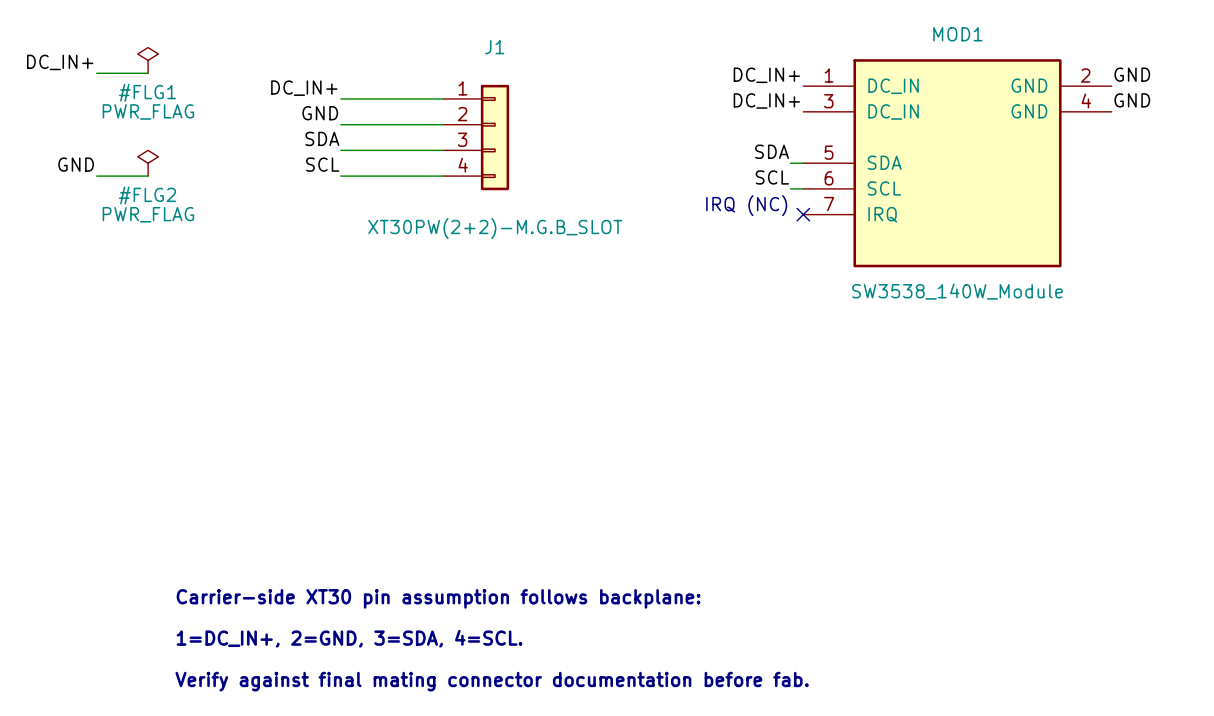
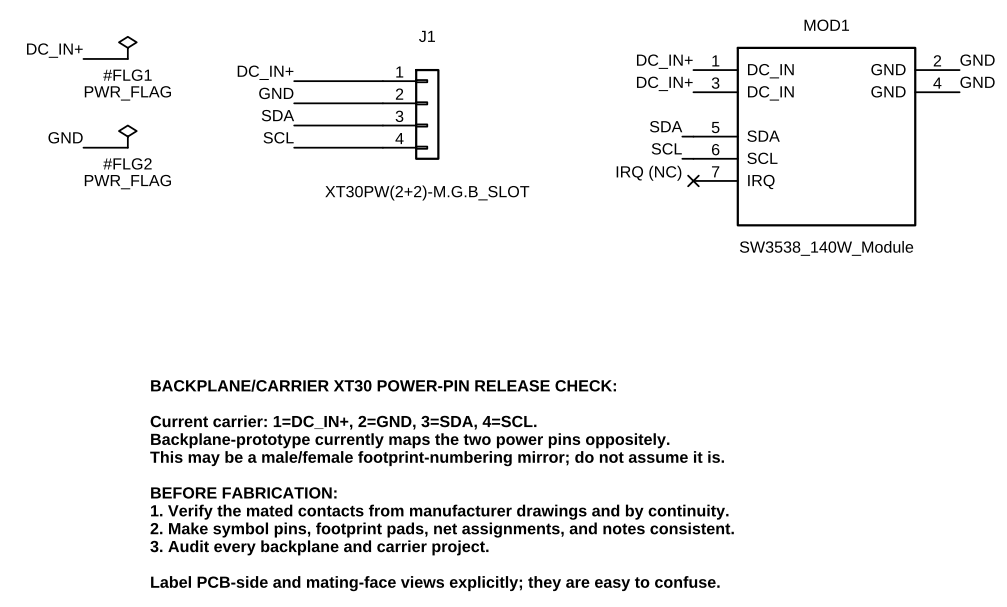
text: none -> BACKPLANE/CARRIER XT30 POWER-PIN RELEASE CHECK: (383, 385)
text: none -> Current carrier: 1=DC_IN+, 2=GND, 3=SDA, 4=SCL. (343, 422)
text: none -> Backplane-prototype currently maps the two power pins oppositely. (410, 440)
text: none -> This may be a male/female footprint-numbering mirror; do not assume it is. (437, 458)
text: none -> BEFORE FABRICATION: (243, 492)
text: Carrier-side XT30 pin assumption follows backplane: (438, 598) -> 1. Verify the mated contacts from manufacturer drawings and by continuity. (439, 512)
text: none -> 2. Make symbol pins, footprint pads, net assignments, and notes consistent. (442, 530)
text: 1=DC_IN+, 2=GND, 3=SDA, 4=SCL. (349, 638) -> 3. Audit every backplane and carrier project. (319, 547)
text: Verify against final mating connector documentation before fab. (492, 681) -> Label PCB-side and mating-face views explicitly; they are easy to confuse. (435, 583)

